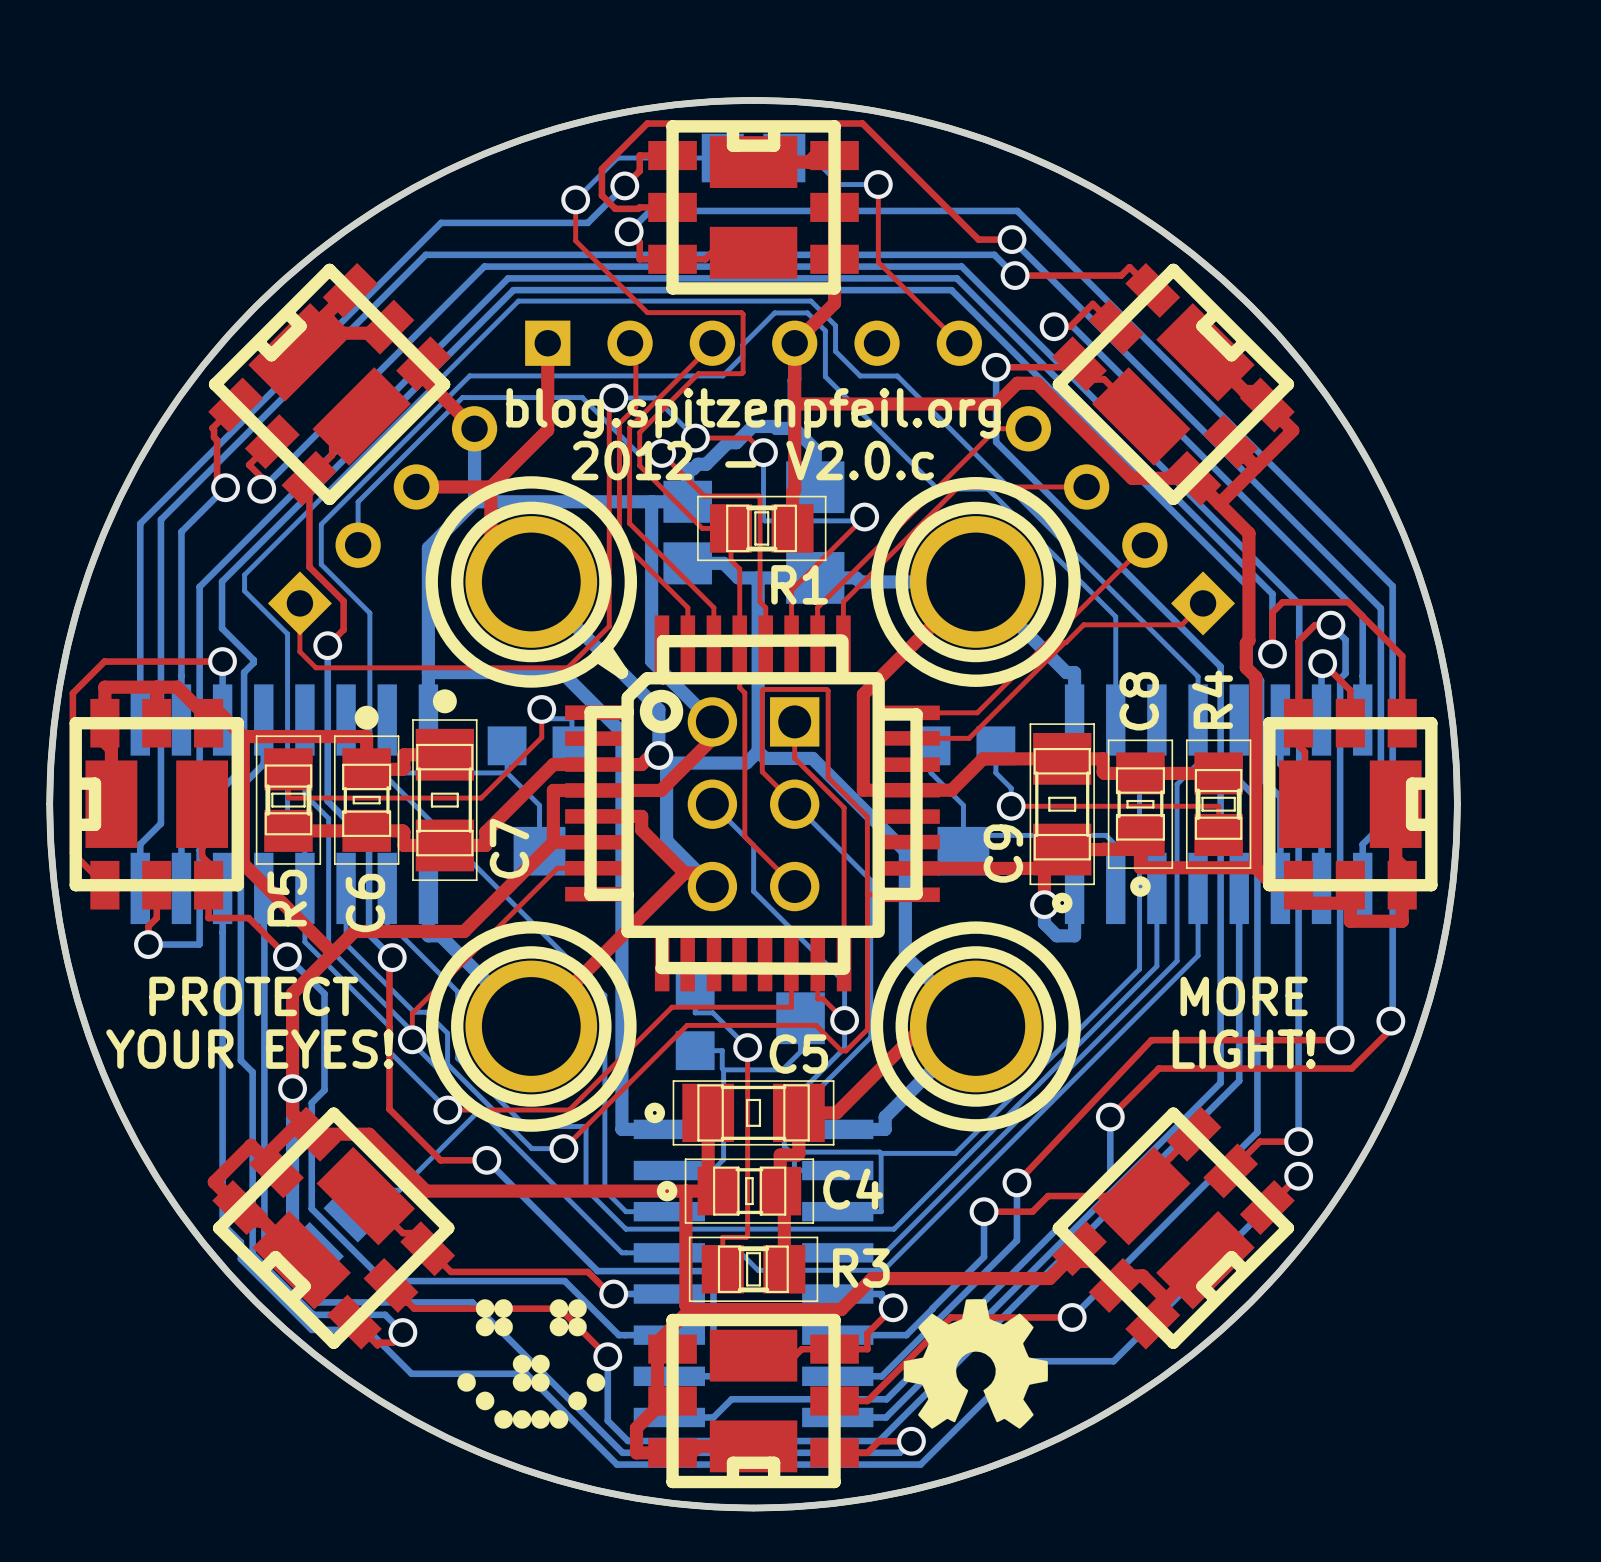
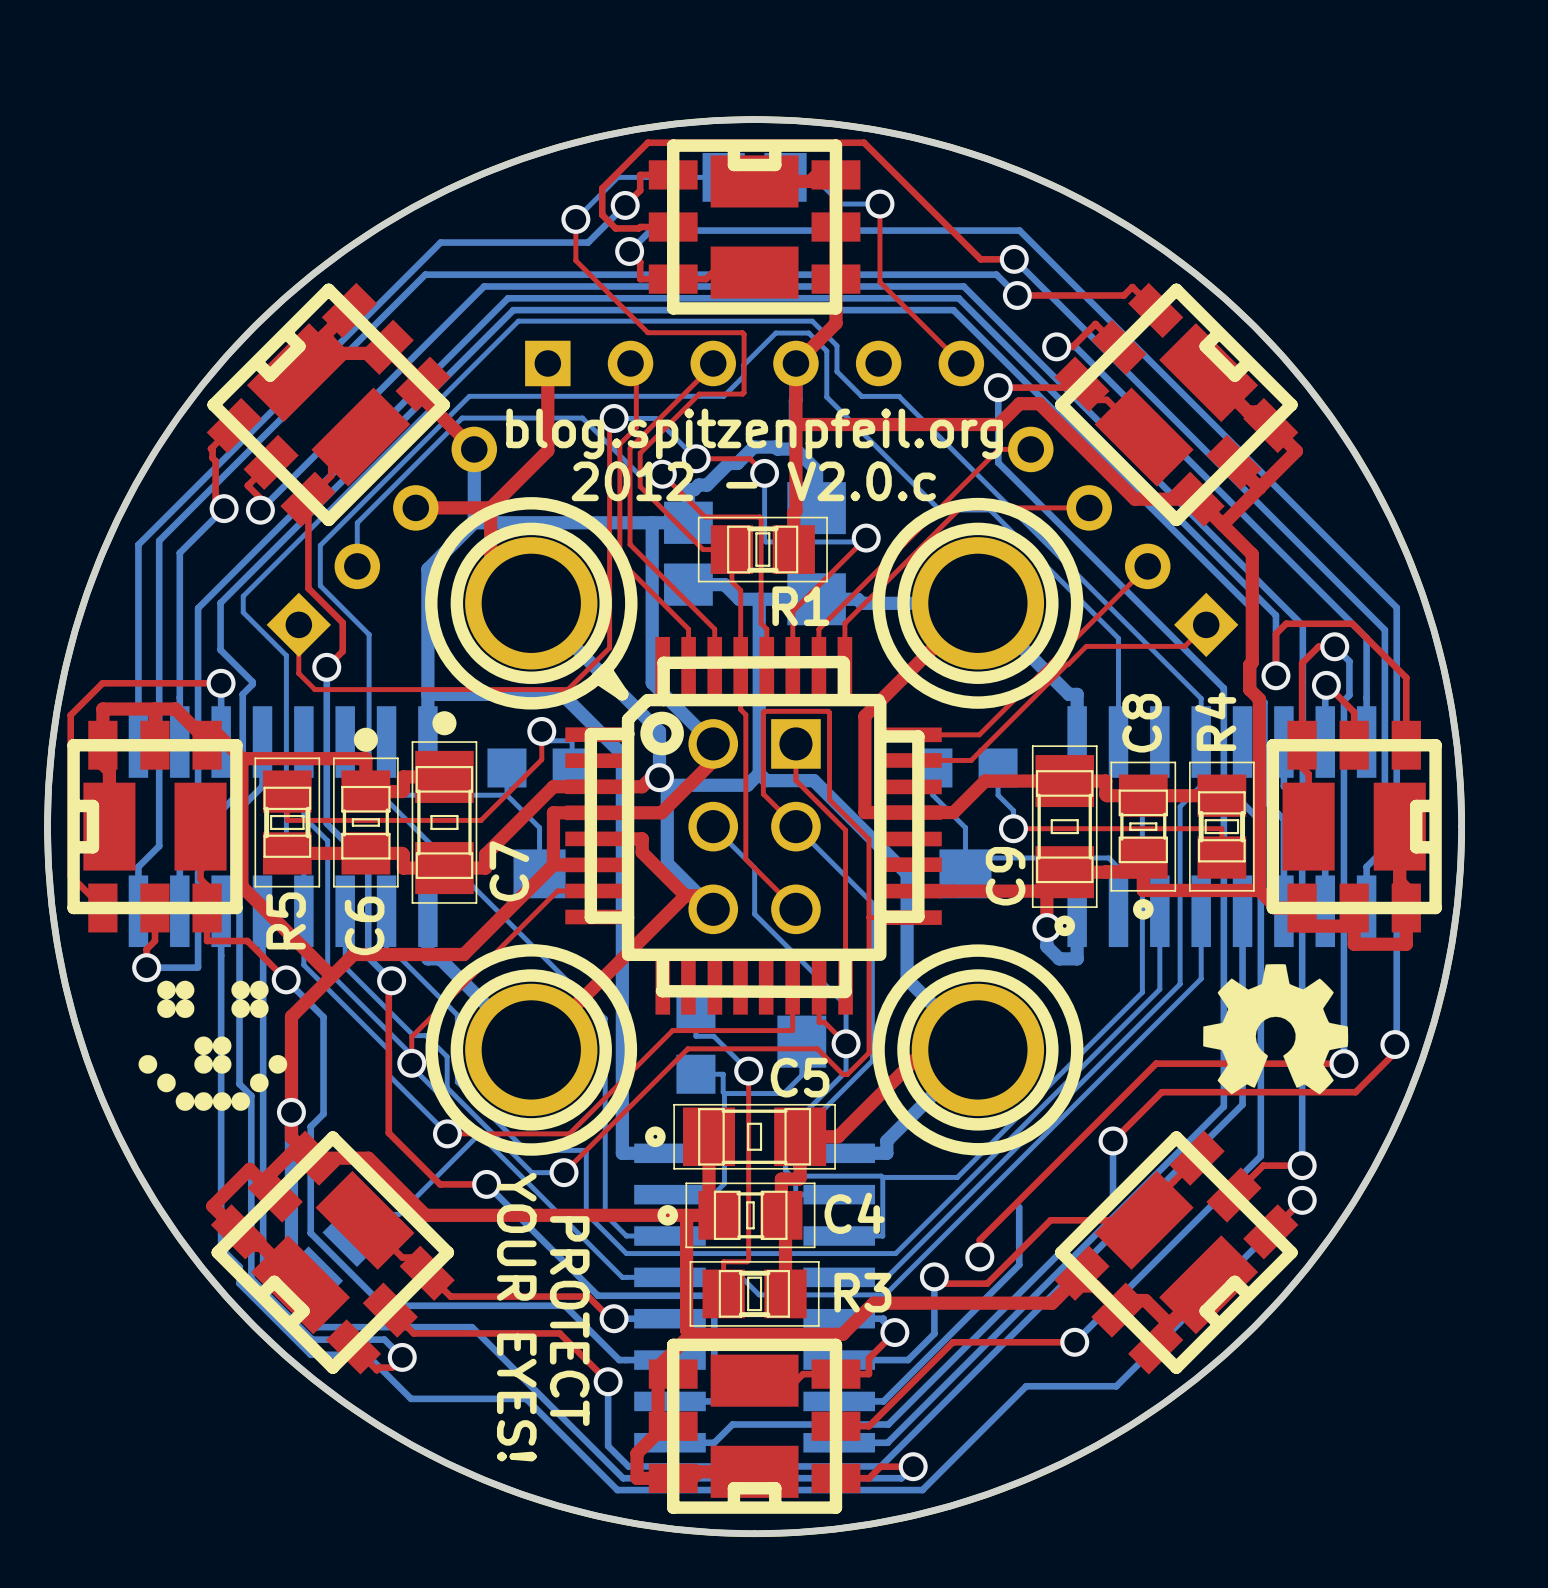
text rotation: 0° (253, 996) -> 90° clockwise (569, 1321)
text position: PROTECT (253, 996) -> PROTECT (569, 1321)
text: MORE (1244, 996) -> none
top track: (1153, 1040) (1016, 1182) -> (1156, 1063) (979, 1239) (979, 1257)
text rotation: 0° (249, 1049) -> 90° clockwise (516, 1317)
text position: YOUR EYES! (249, 1049) -> YOUR EYES! (516, 1317)
text: LIGHT! (1244, 1049) -> none
via: (1016, 1182) -> none
bottom track: (984, 1211) (984, 1256) (932, 1308) -> (934, 1276) (934, 1333)
top track: (984, 1211) (1032, 1211) -> (934, 1276) (941, 1283) (987, 1283) (1034, 1236)
via position: (984, 1211) -> (979, 1257)
via: none -> (934, 1276)
drawing position: (531, 1363) -> (212, 1045)
drawing position: (975, 1363) -> (1275, 1029)

